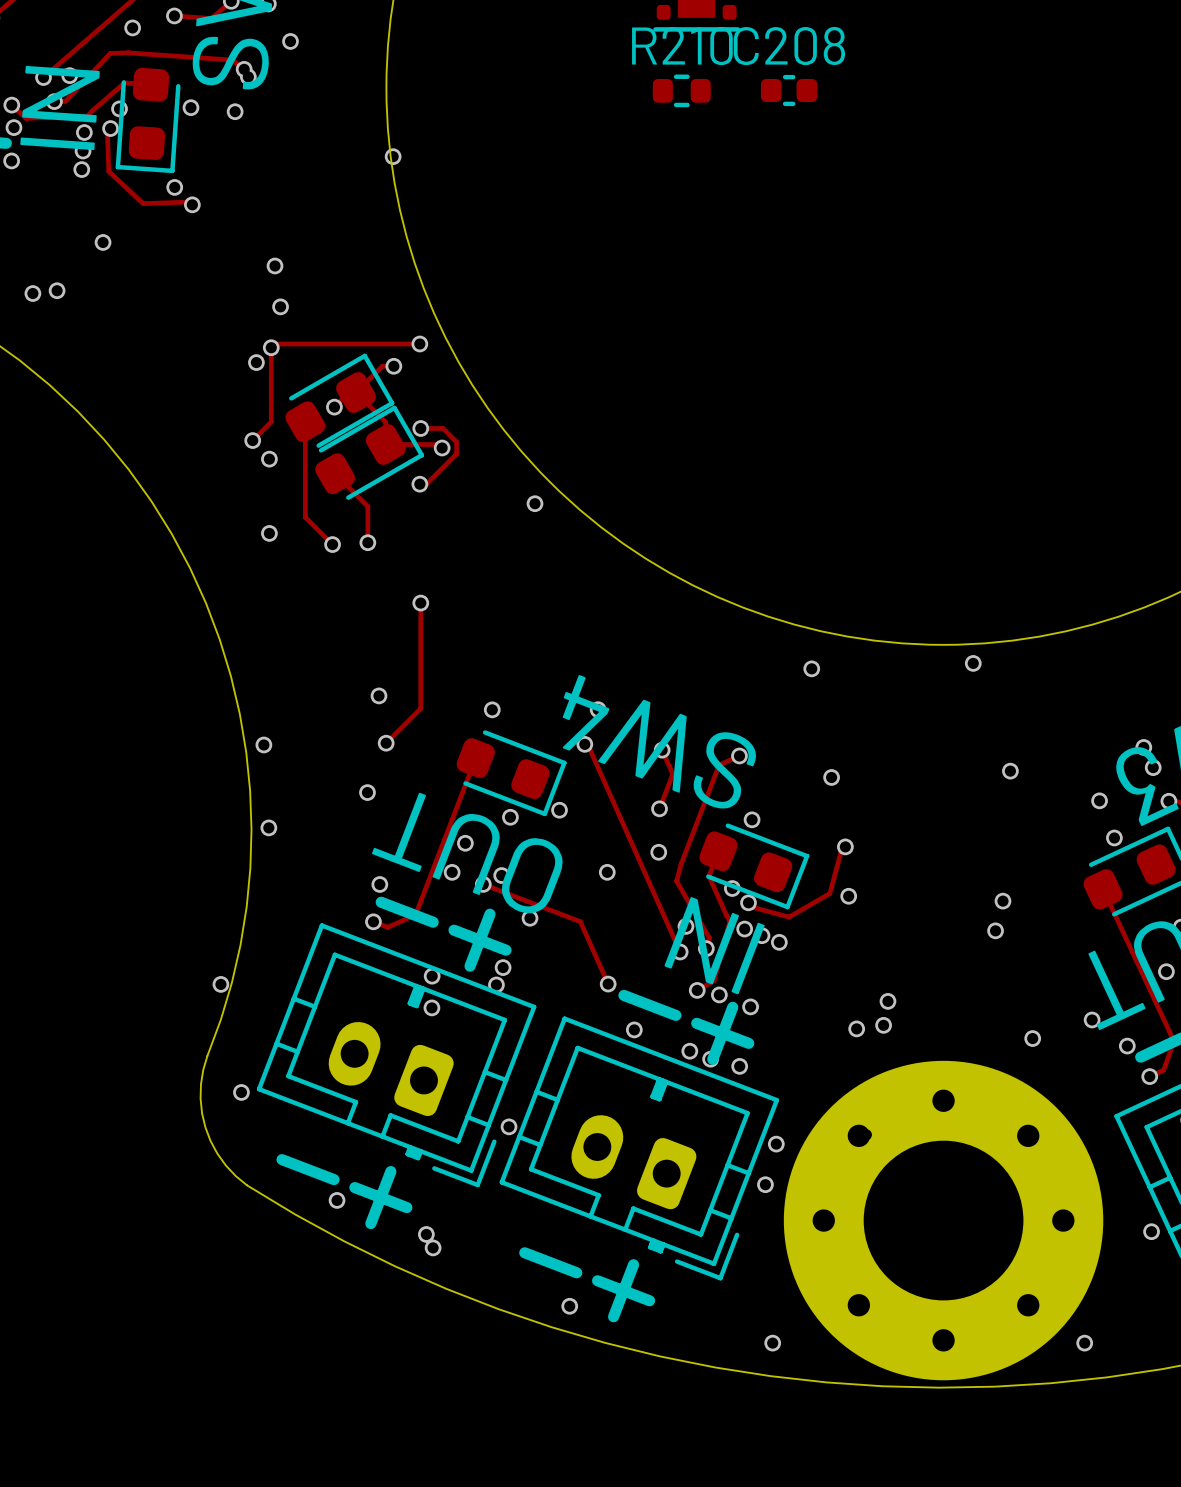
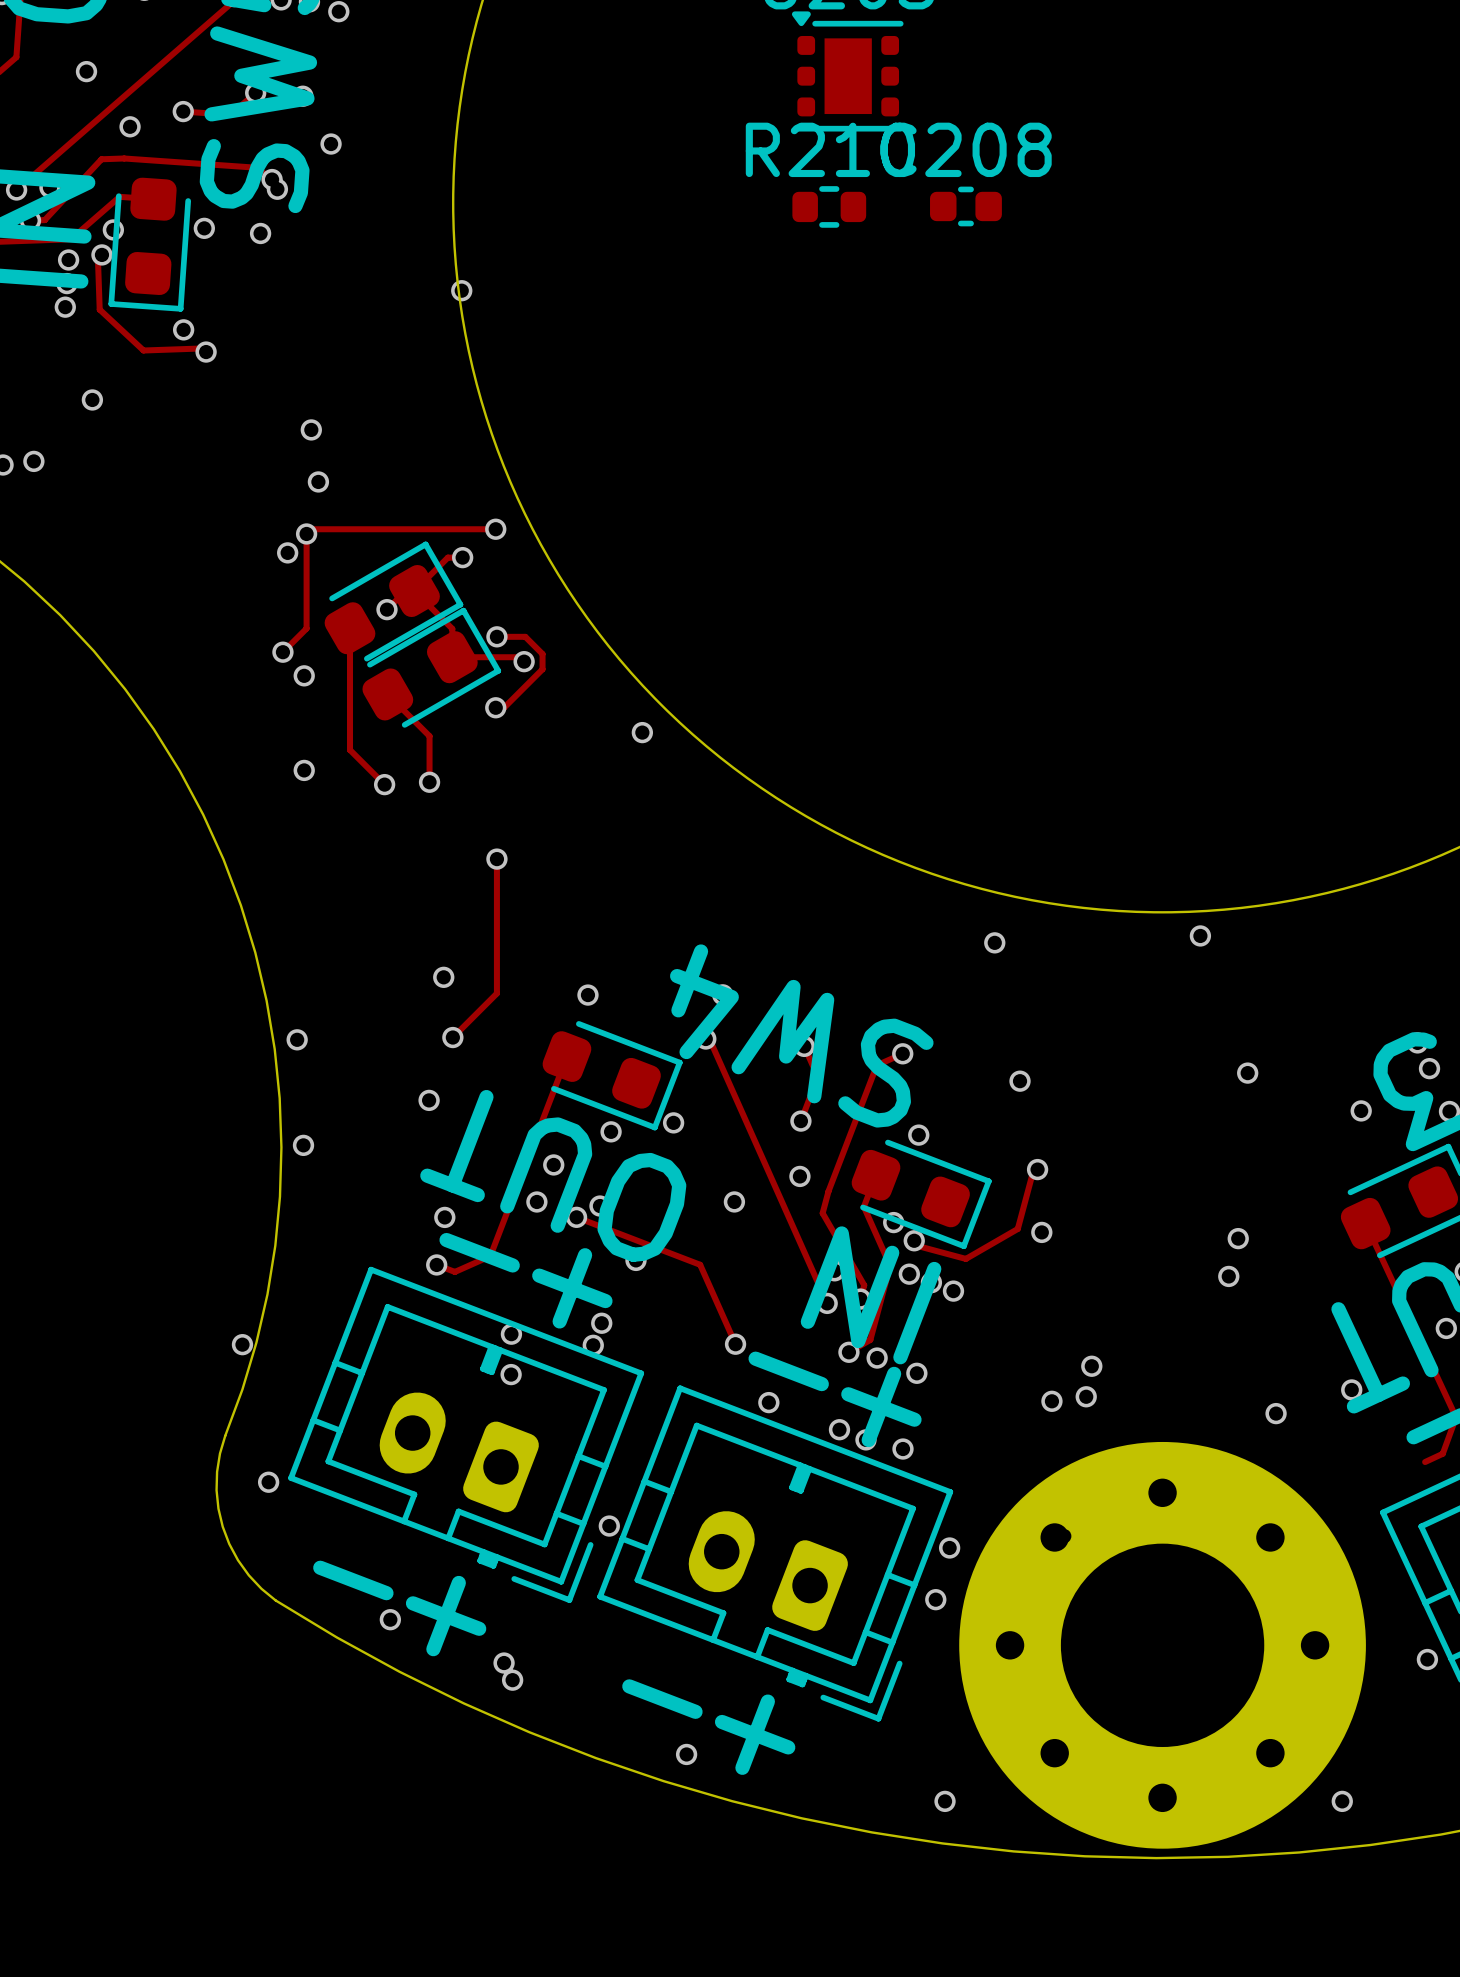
via: (1114, 837) -> none
via: (1127, 1046) -> none
via: (1149, 1076) -> none

